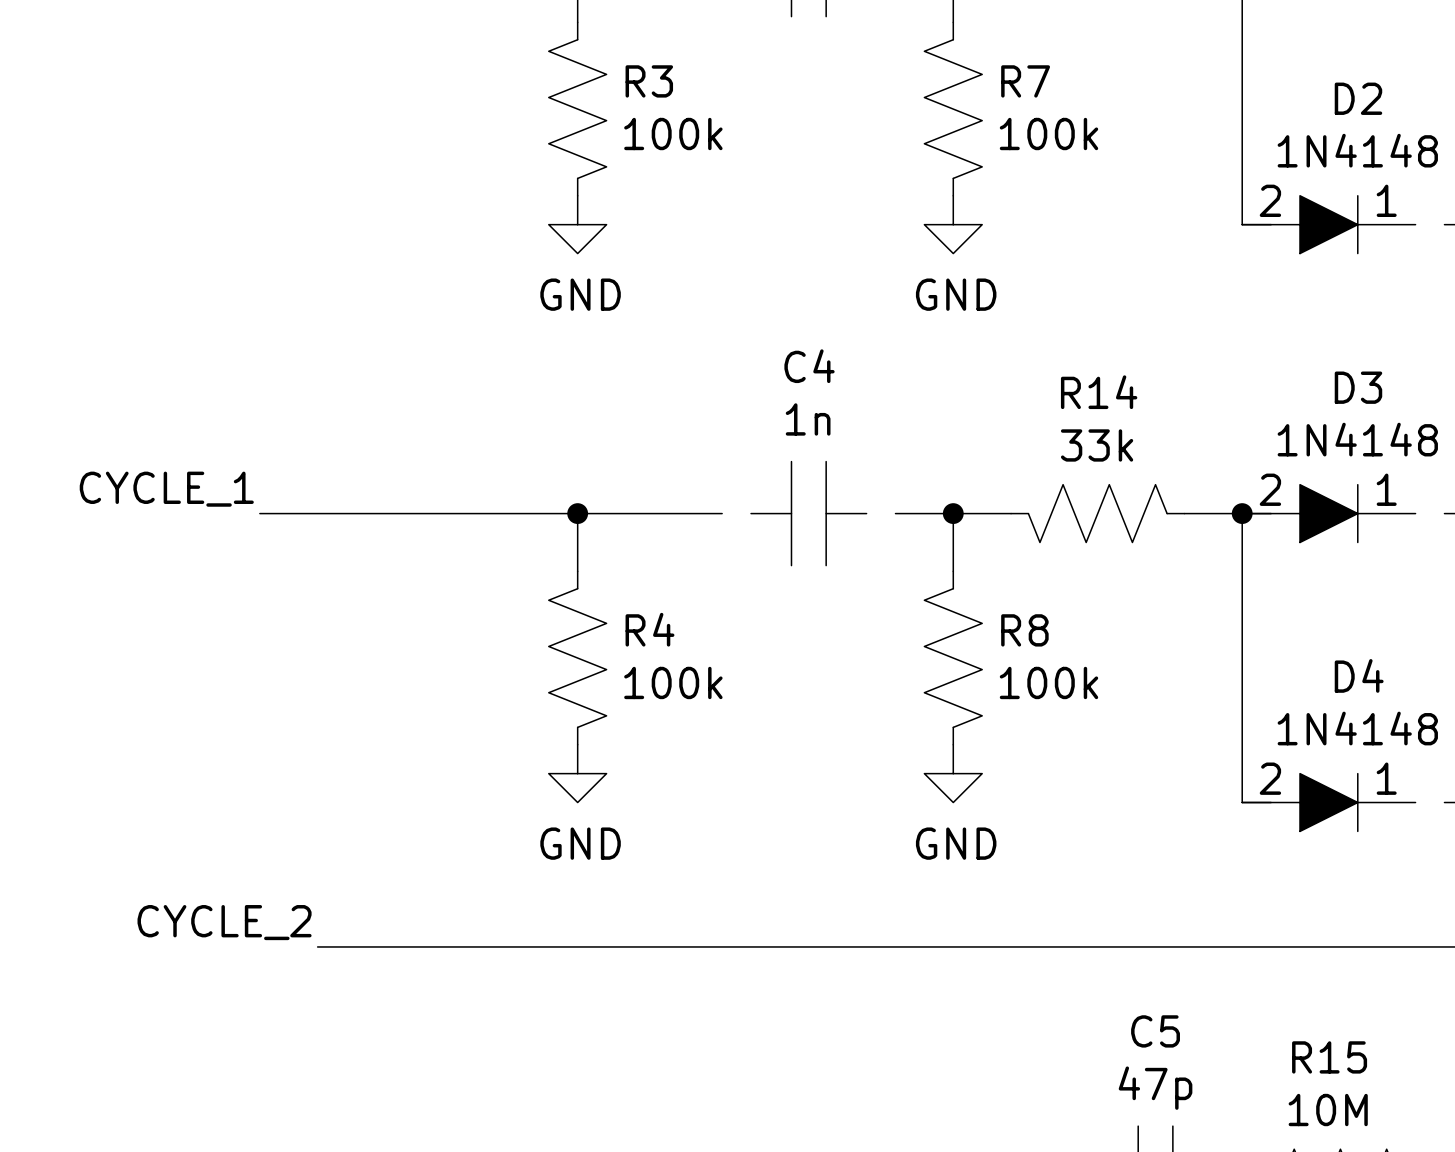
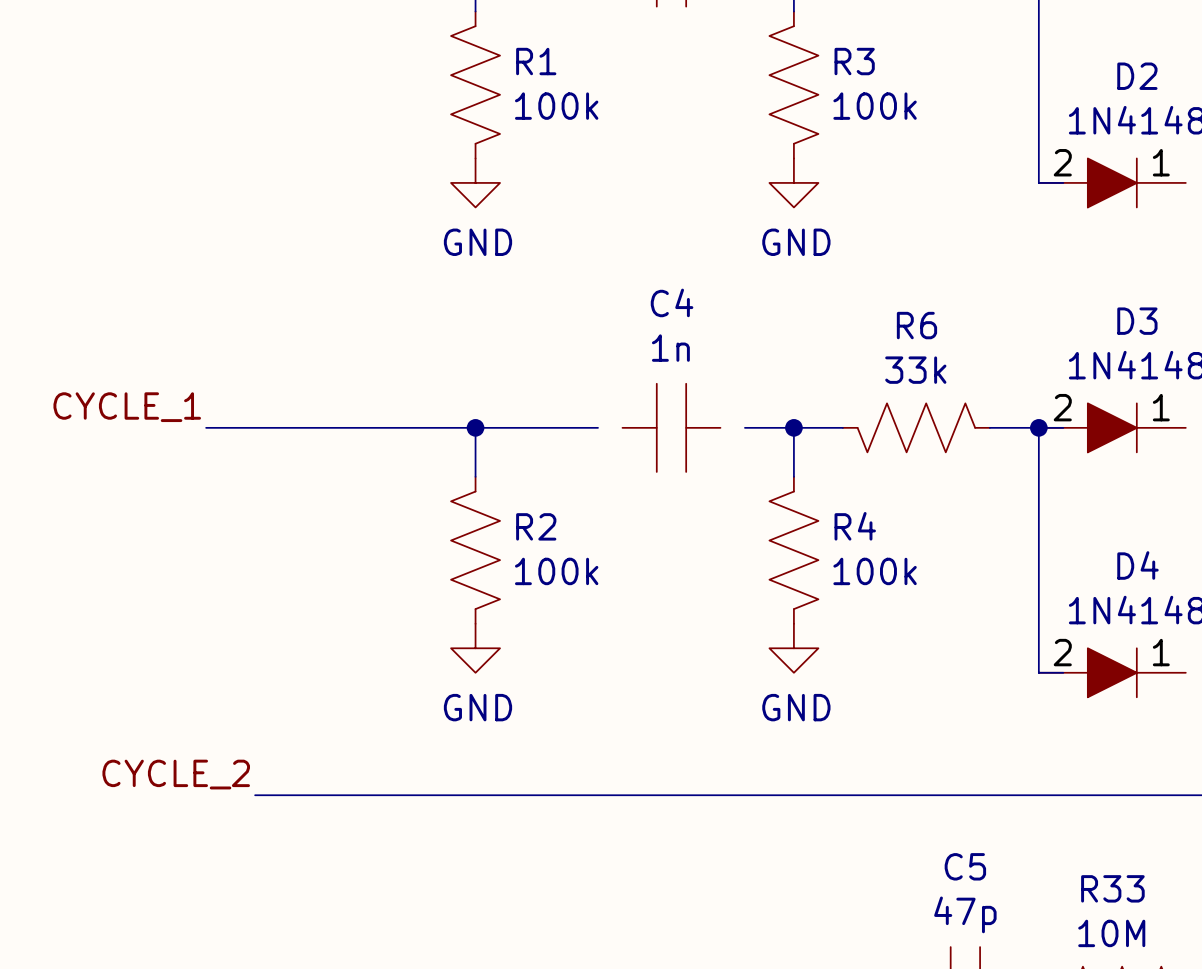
R3 name: R3 (649, 81) -> R1 (536, 61)
R7 name: R7 (1025, 81) -> R3 (854, 61)
R14 name: R14 (1099, 392) -> R6 (916, 325)
R4 name: R4 (649, 629) -> R2 (536, 526)
R8 name: R8 (1024, 630) -> R4 (855, 526)
R15 name: R15 (1329, 1057) -> R33 (1112, 888)

